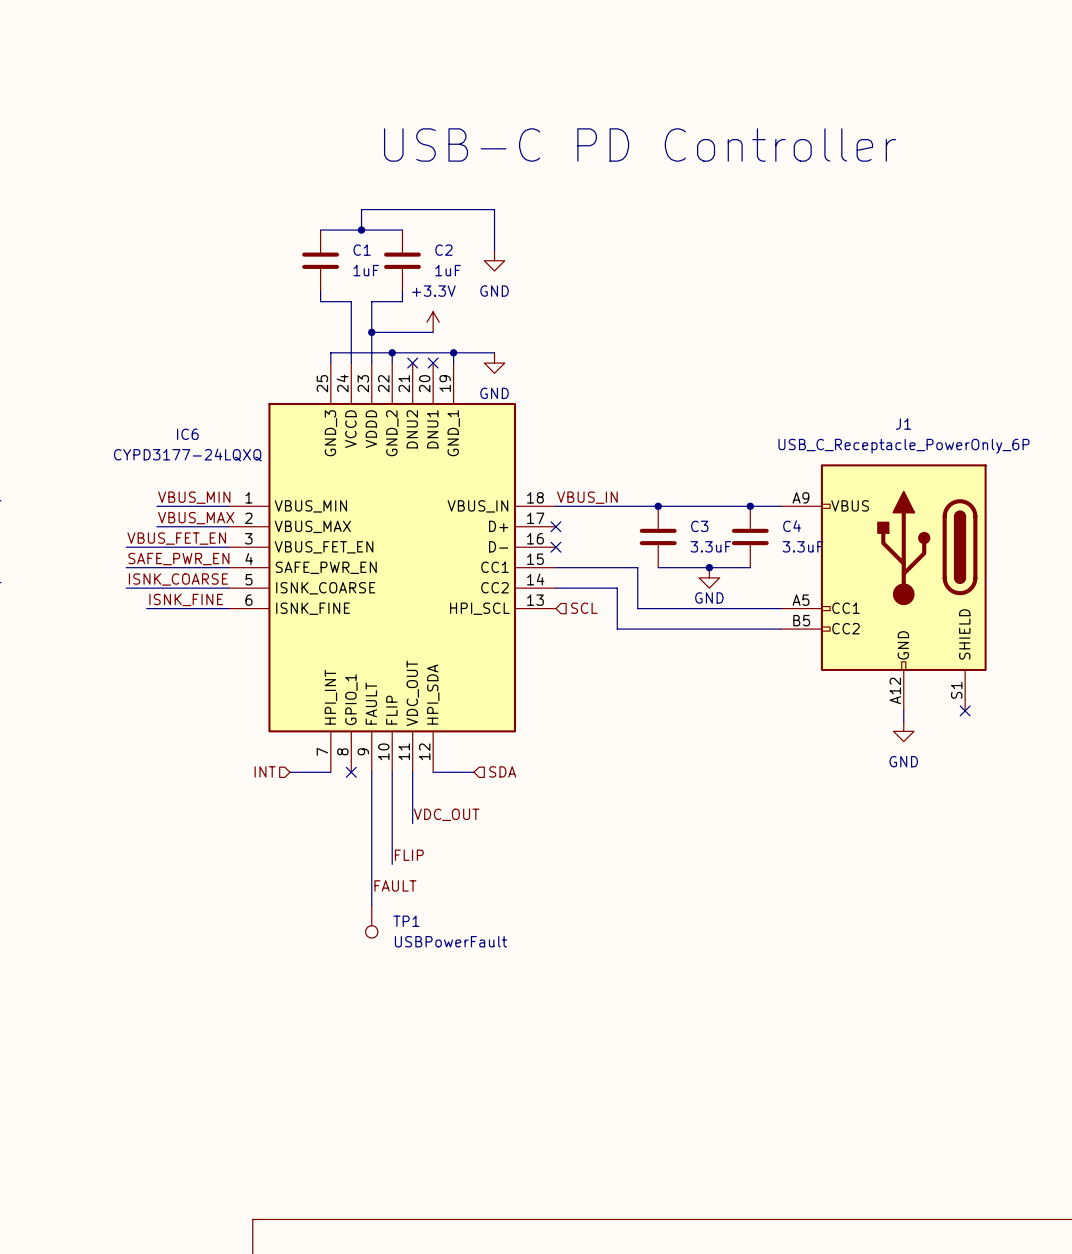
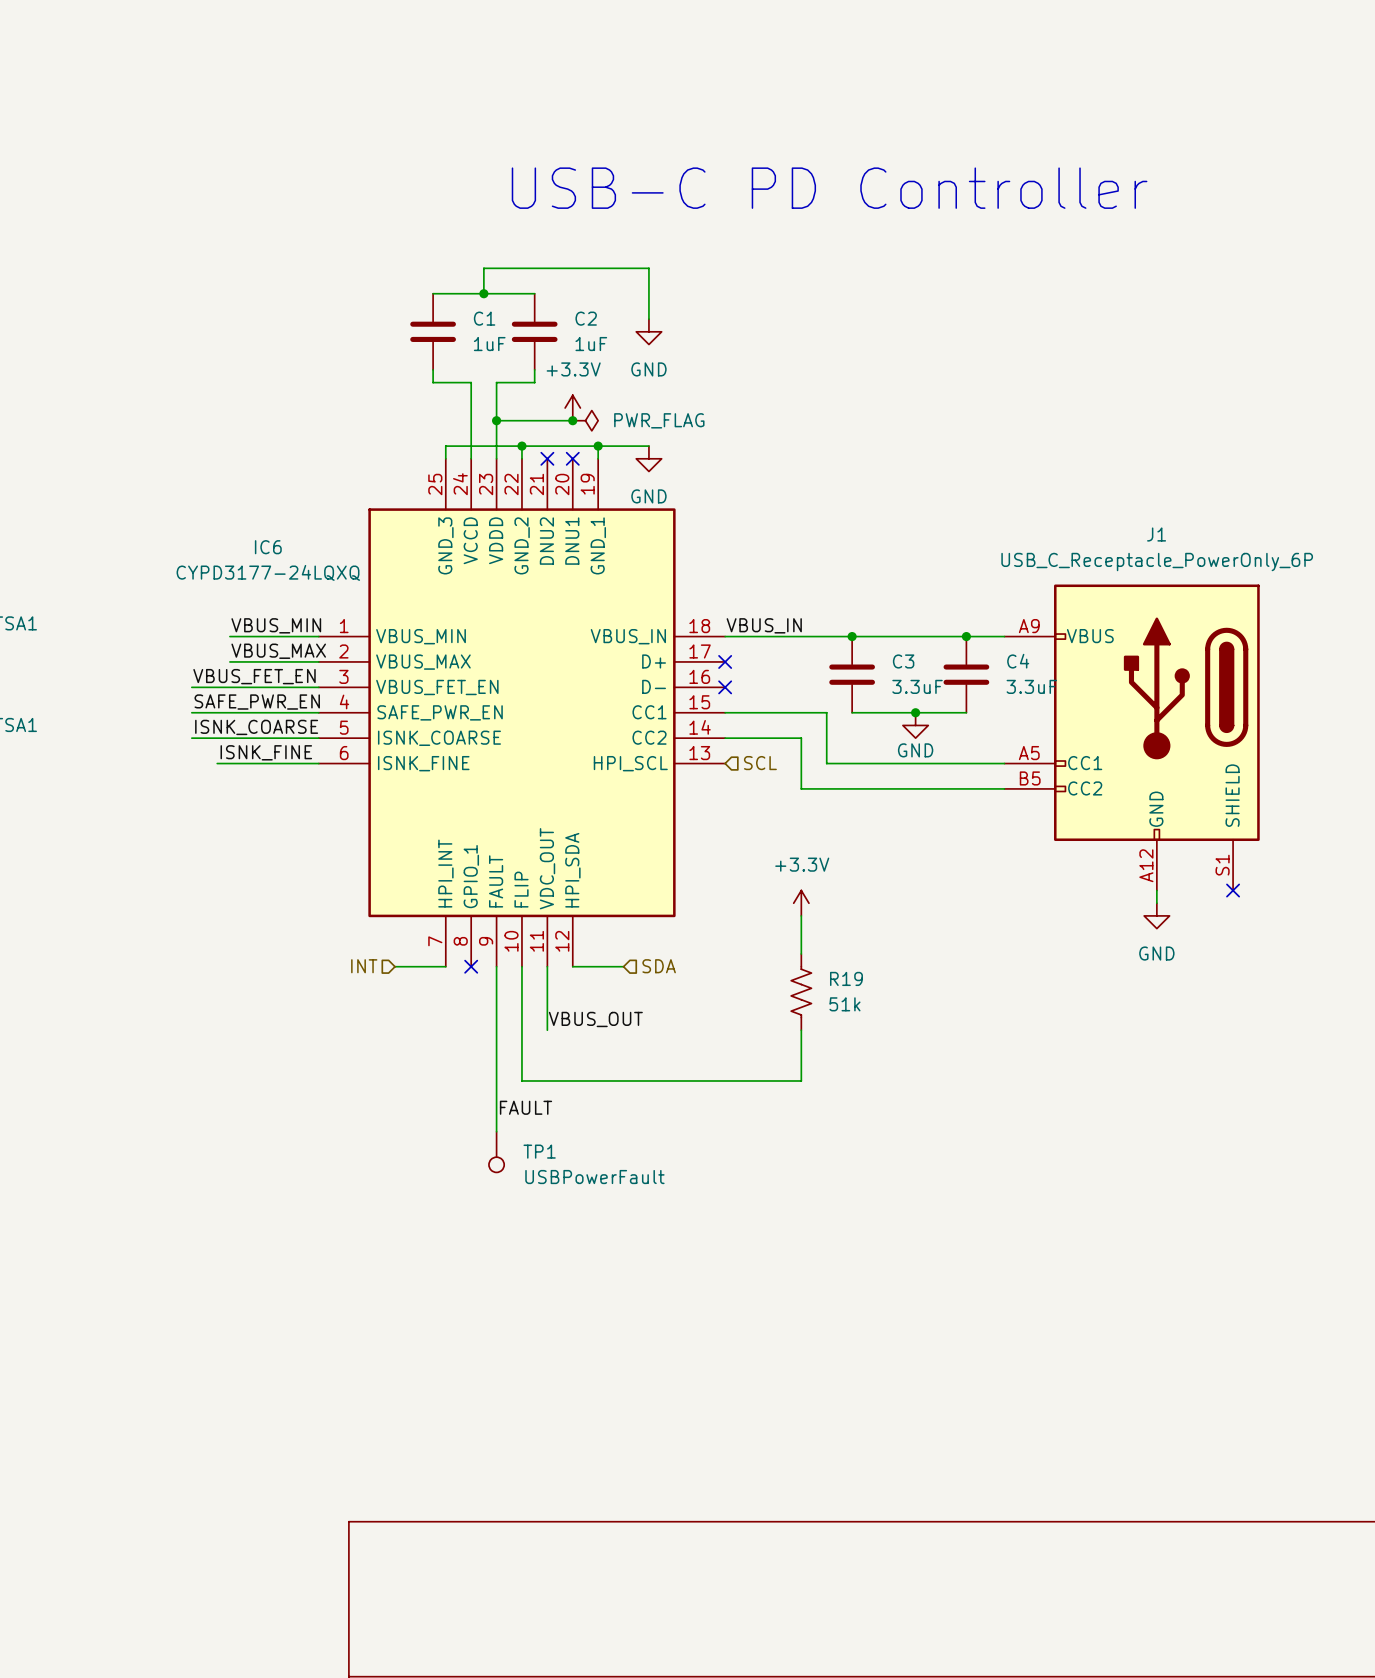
junction: none -> (572, 420)
power symbol: none -> PWR_FLAG (585, 420)
power symbol: none -> +3.3V (801, 903)
wire: none -> (801, 915) (801, 954)
R19: none -> 51k (801, 992)
label: VDC_OUT (446, 814) -> VBUS_OUT (595, 1019)
wire: none -> (801, 1030) (801, 1080) (521, 1080)
label: FLIP (409, 855) -> none

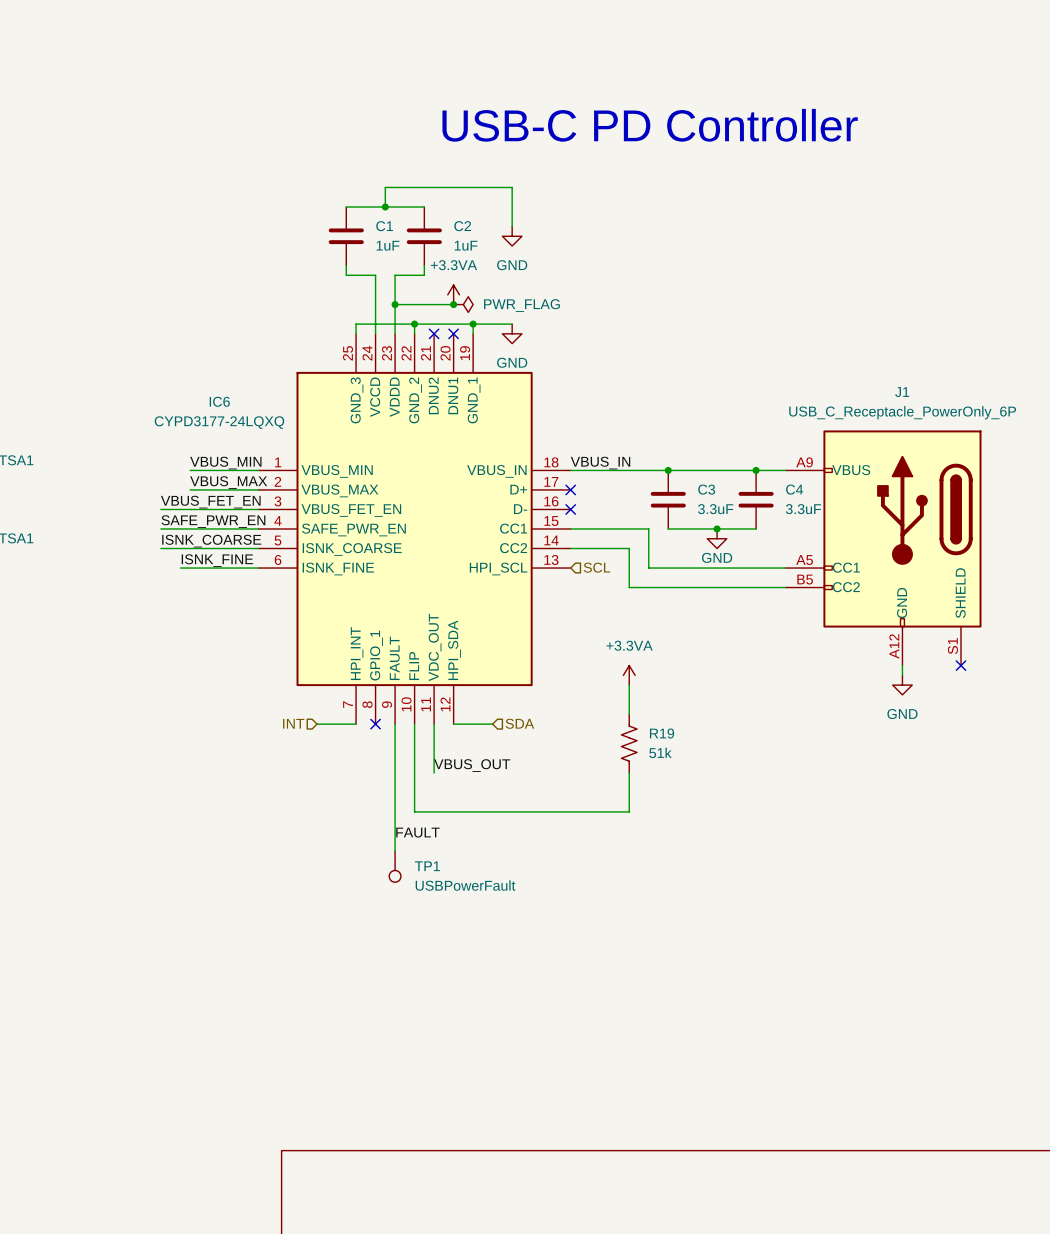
power symbol: +3.3V (572, 408) -> +3.3VA (453, 294)
power symbol: +3.3V (801, 903) -> +3.3VA (629, 675)

